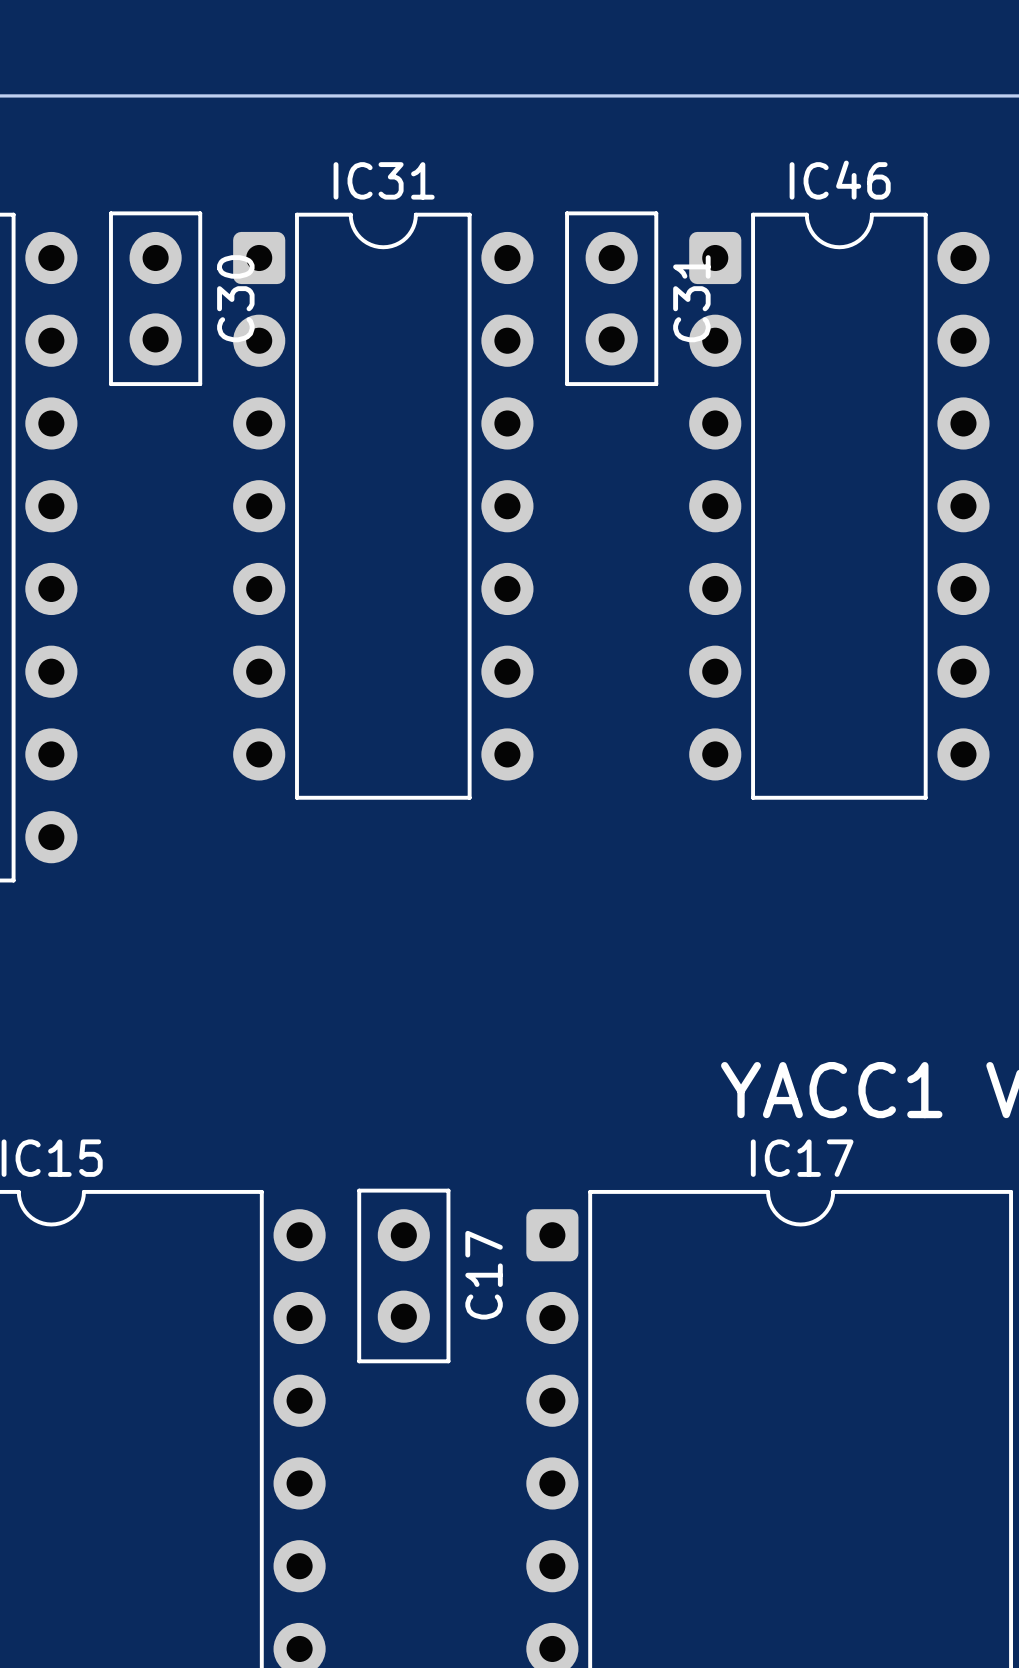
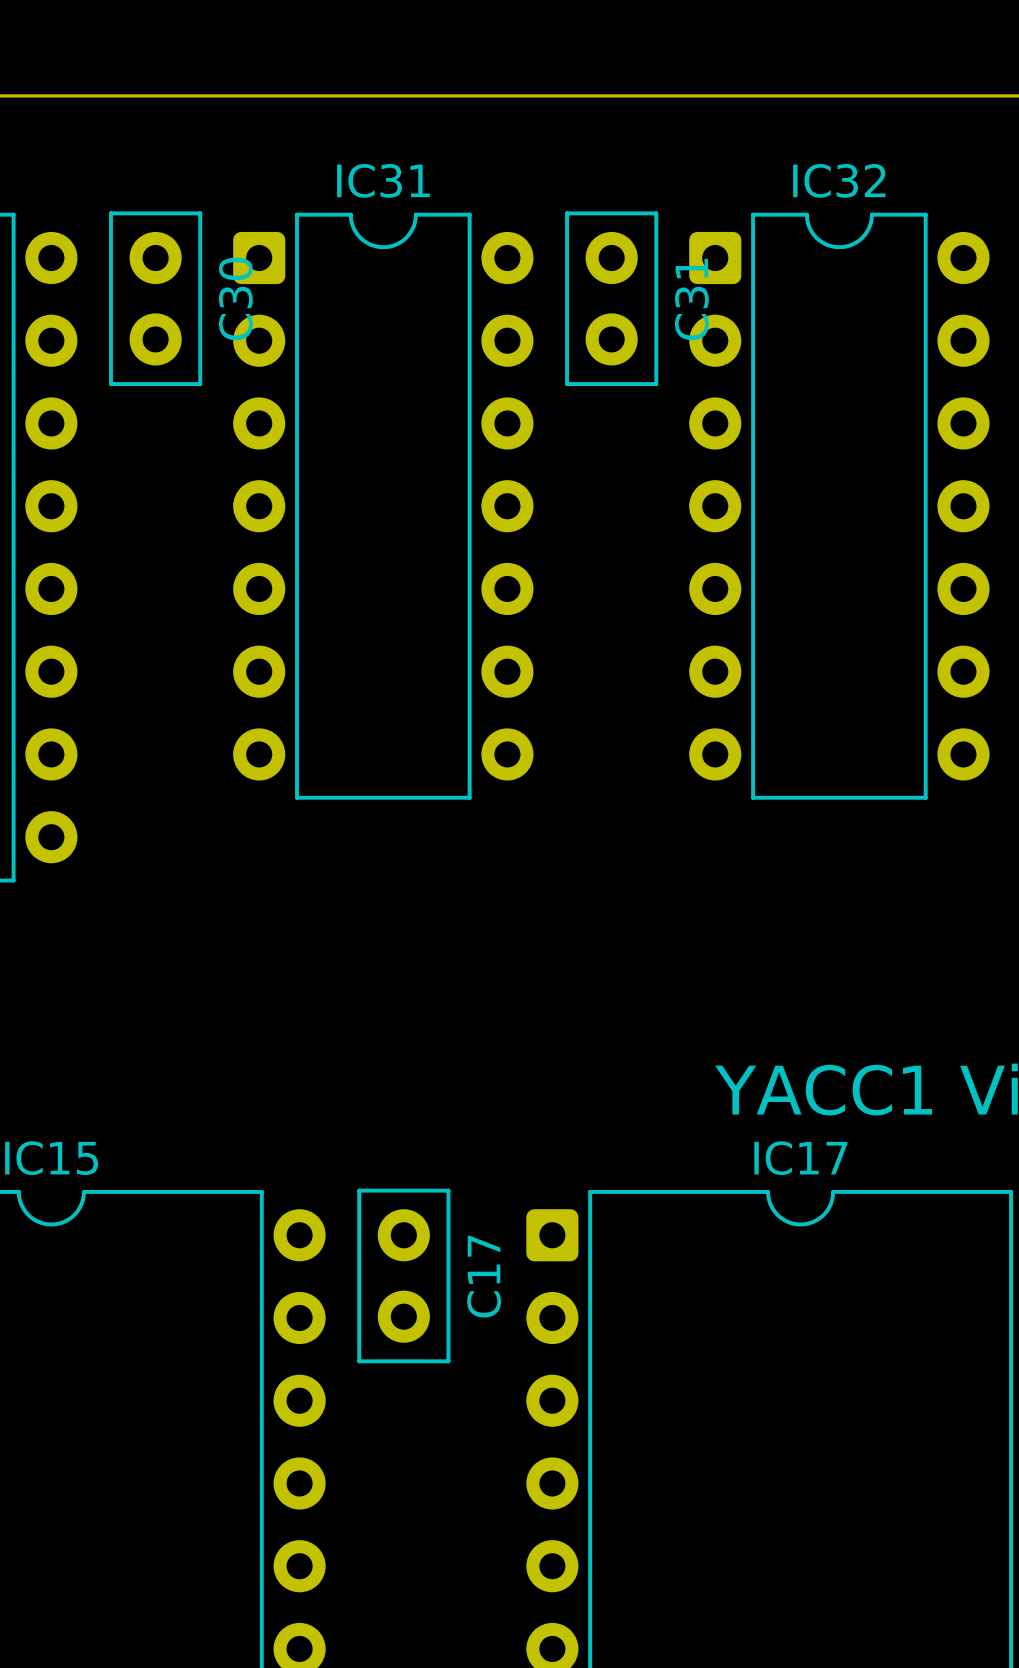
IC46 name: IC46 (840, 180) -> IC32 (839, 180)

